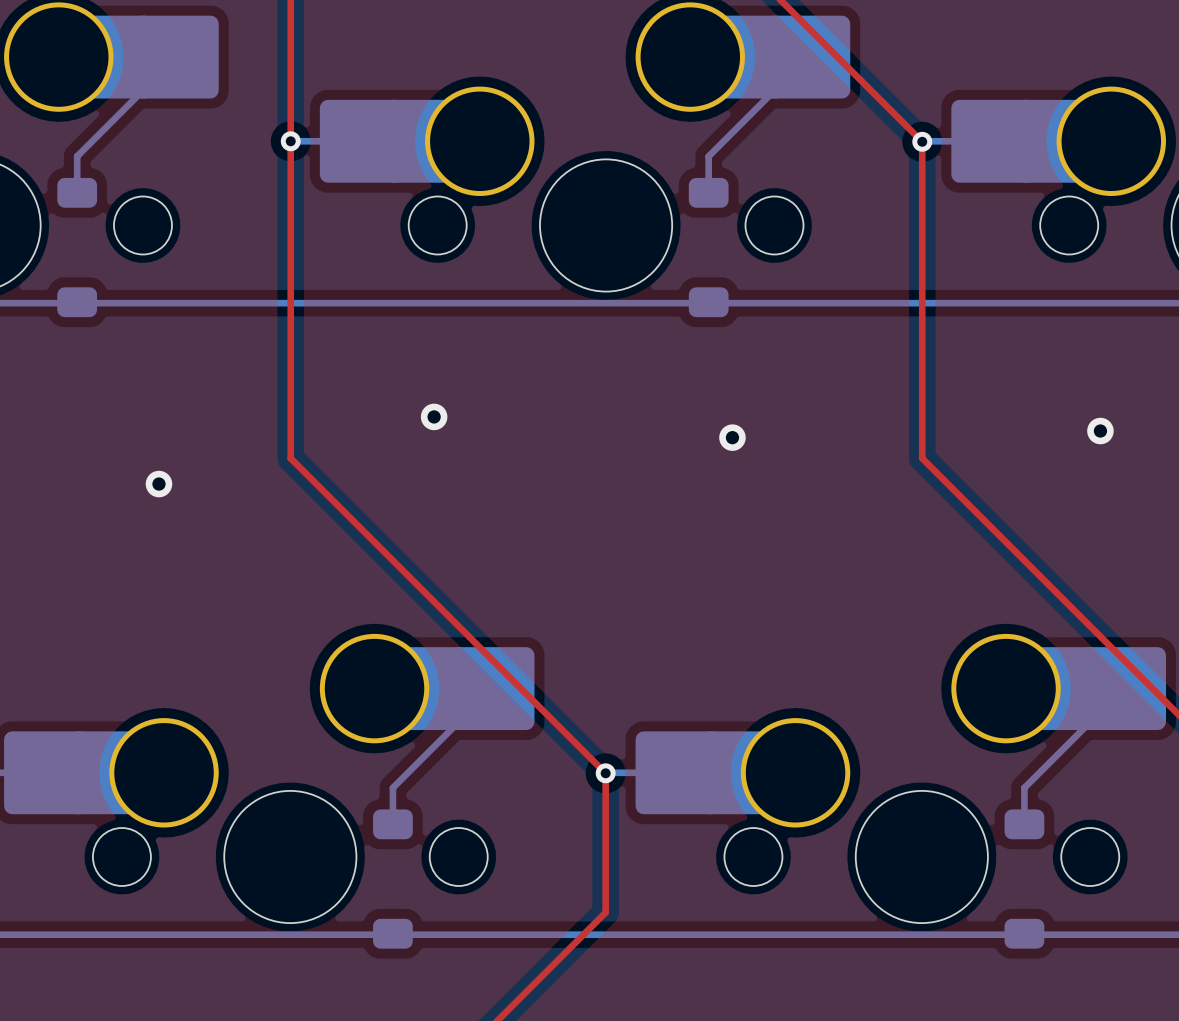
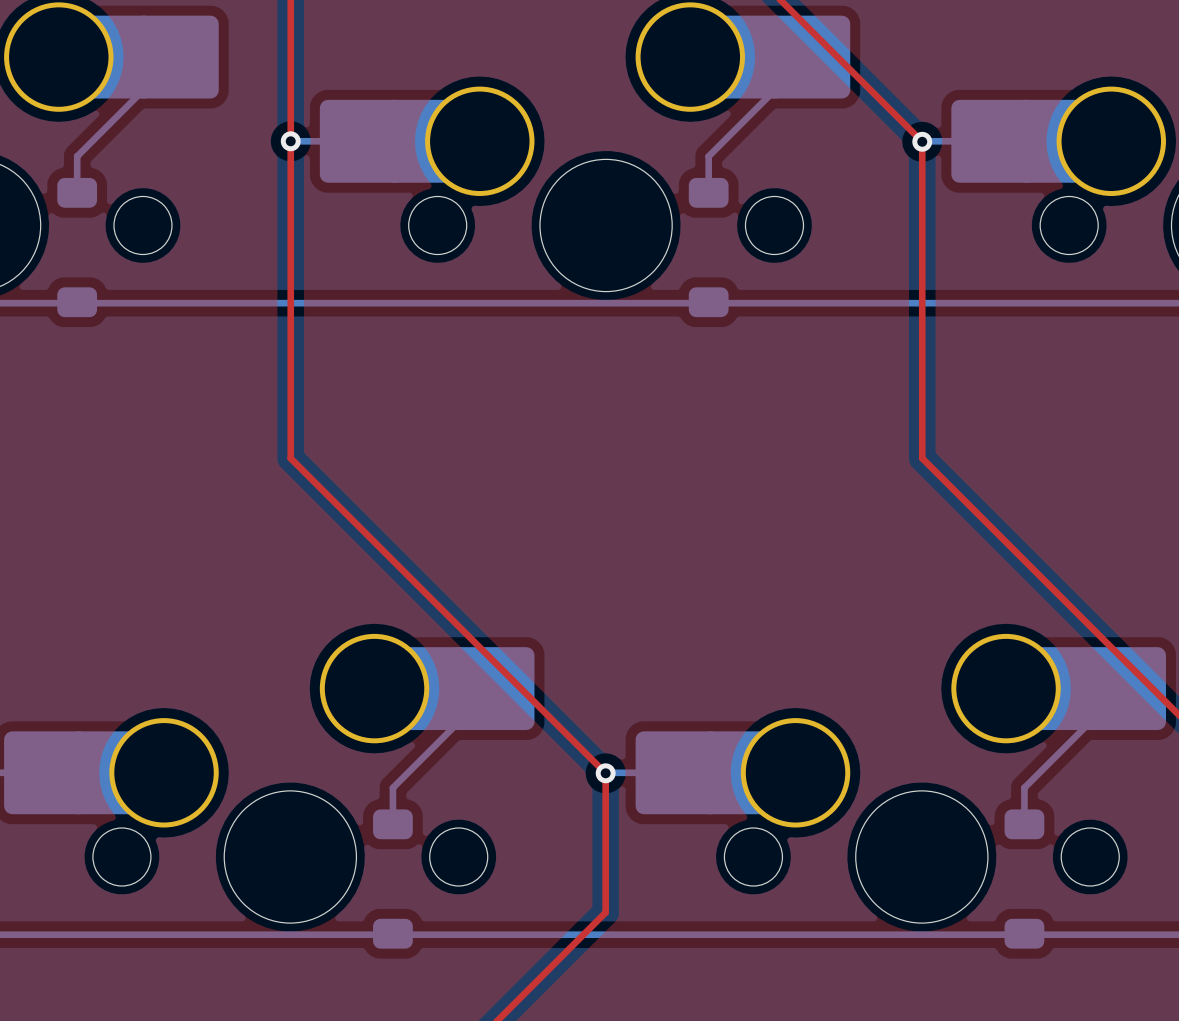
via: (434, 416) -> none
via: (1100, 431) -> none
via: (732, 437) -> none
via: (158, 484) -> none

